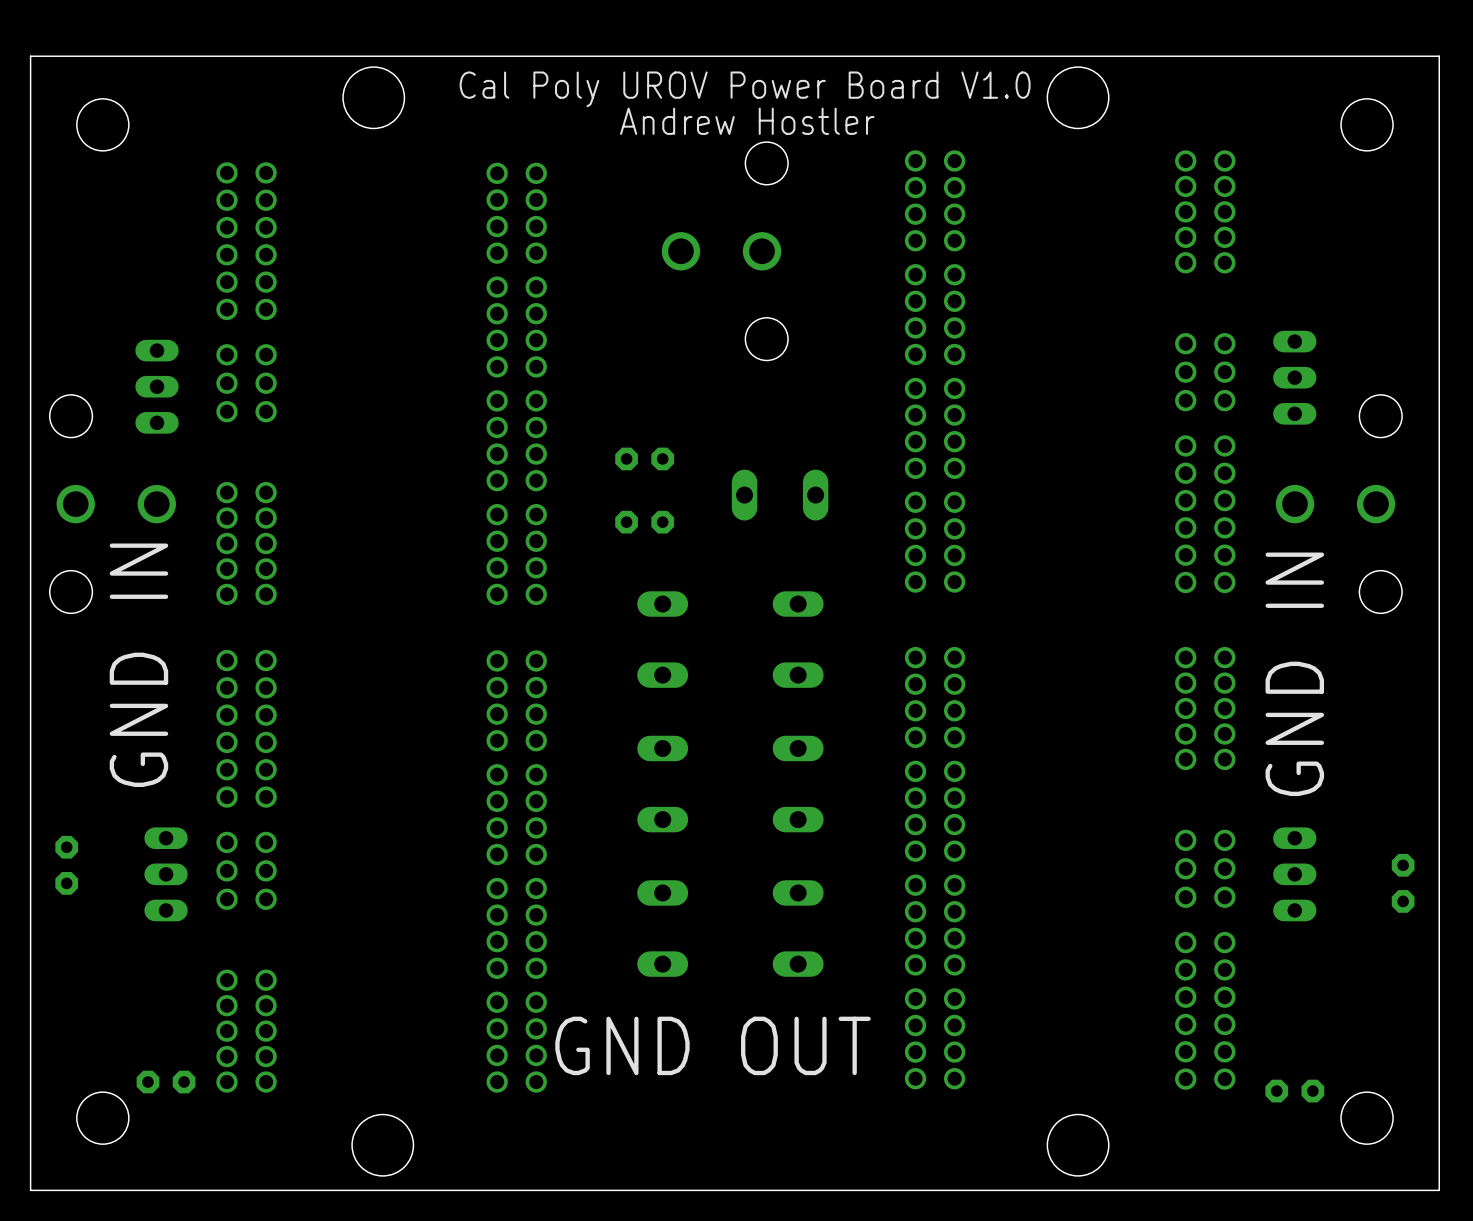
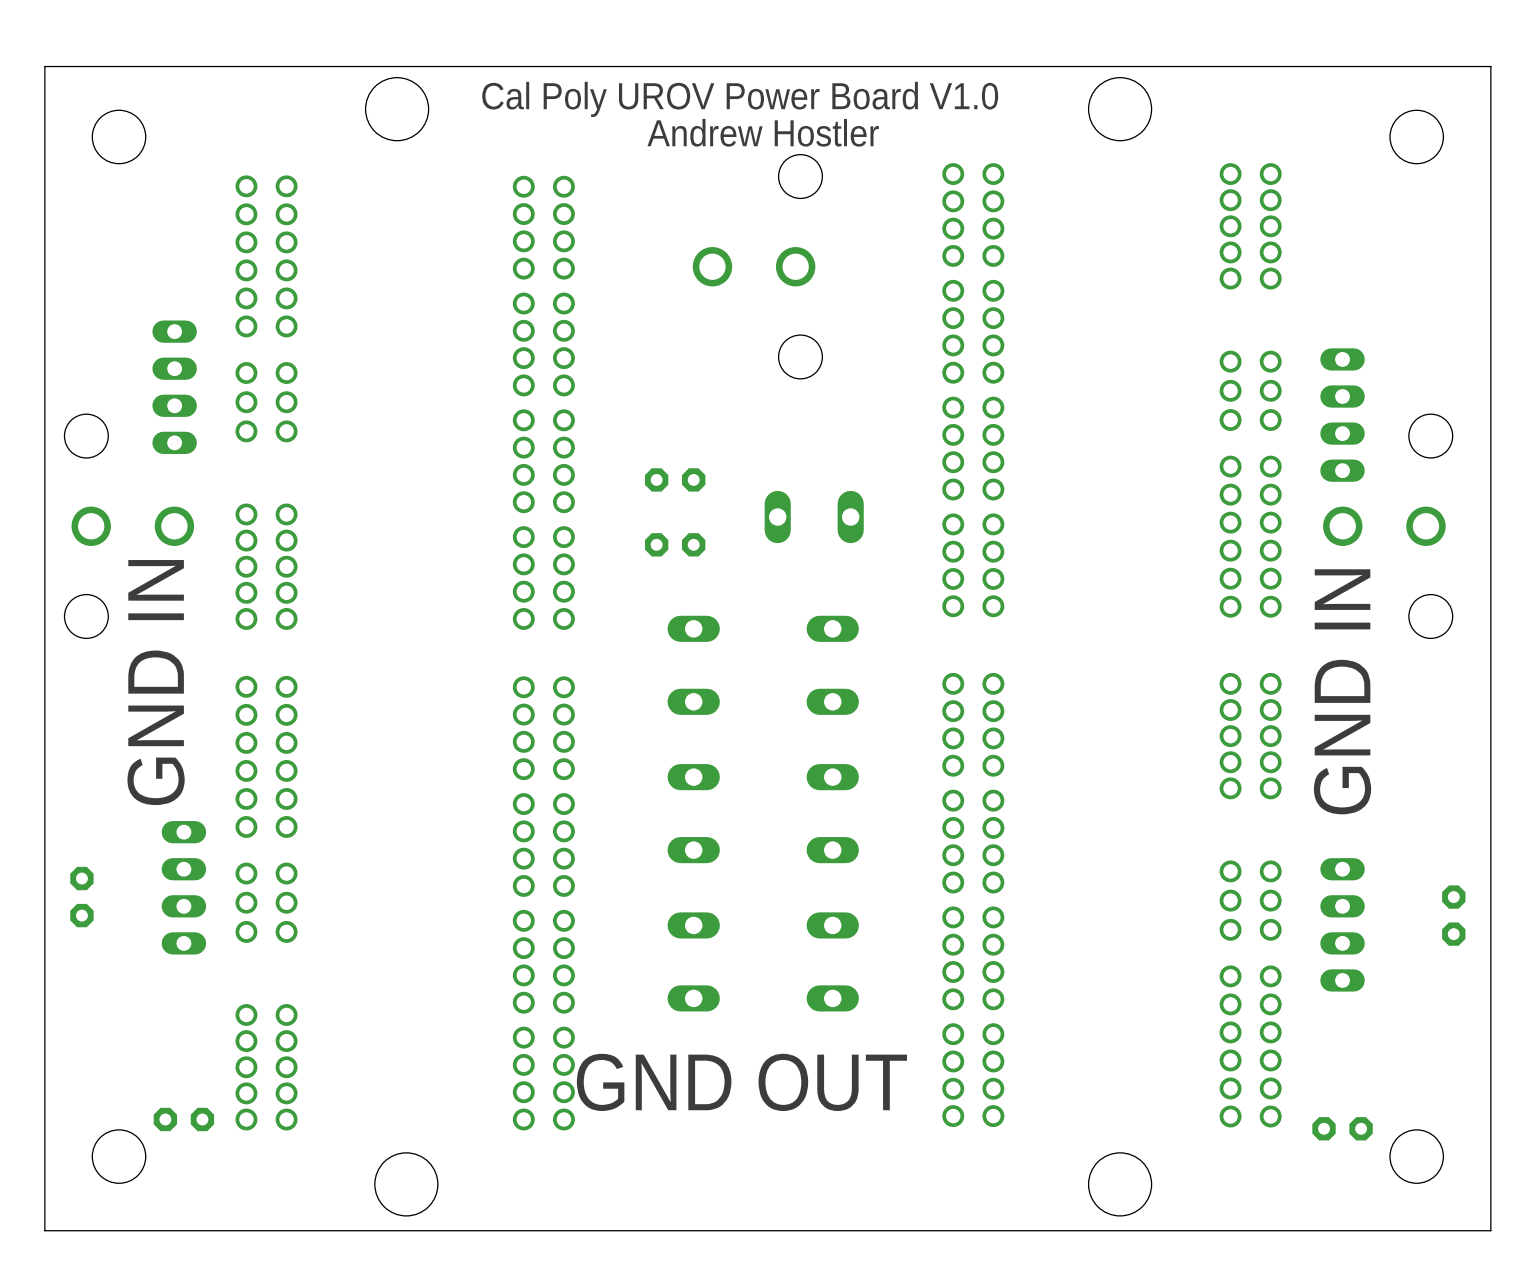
part: none -> (174, 387)
part: none -> (1342, 415)
part: none -> (183, 887)
part: none -> (1342, 924)

